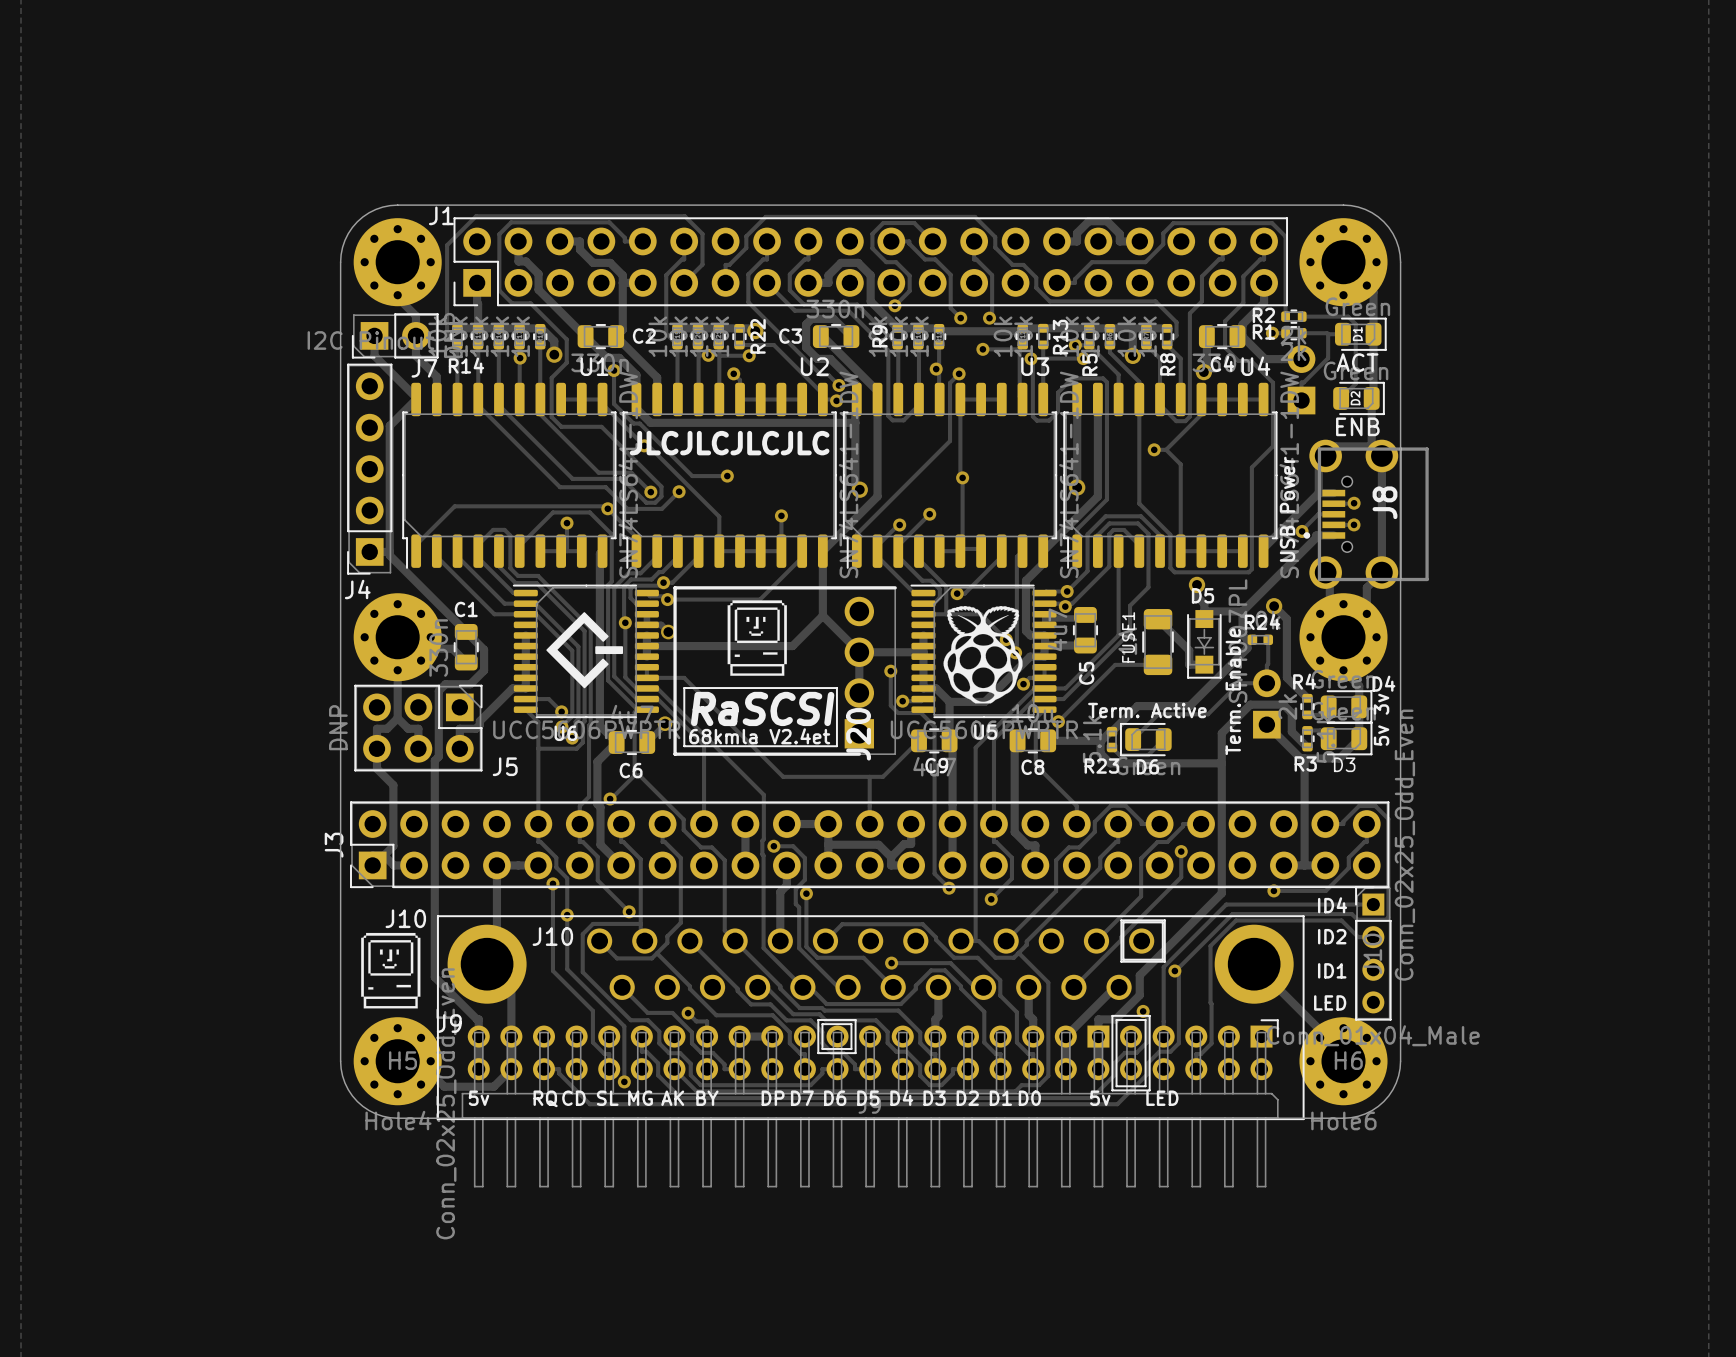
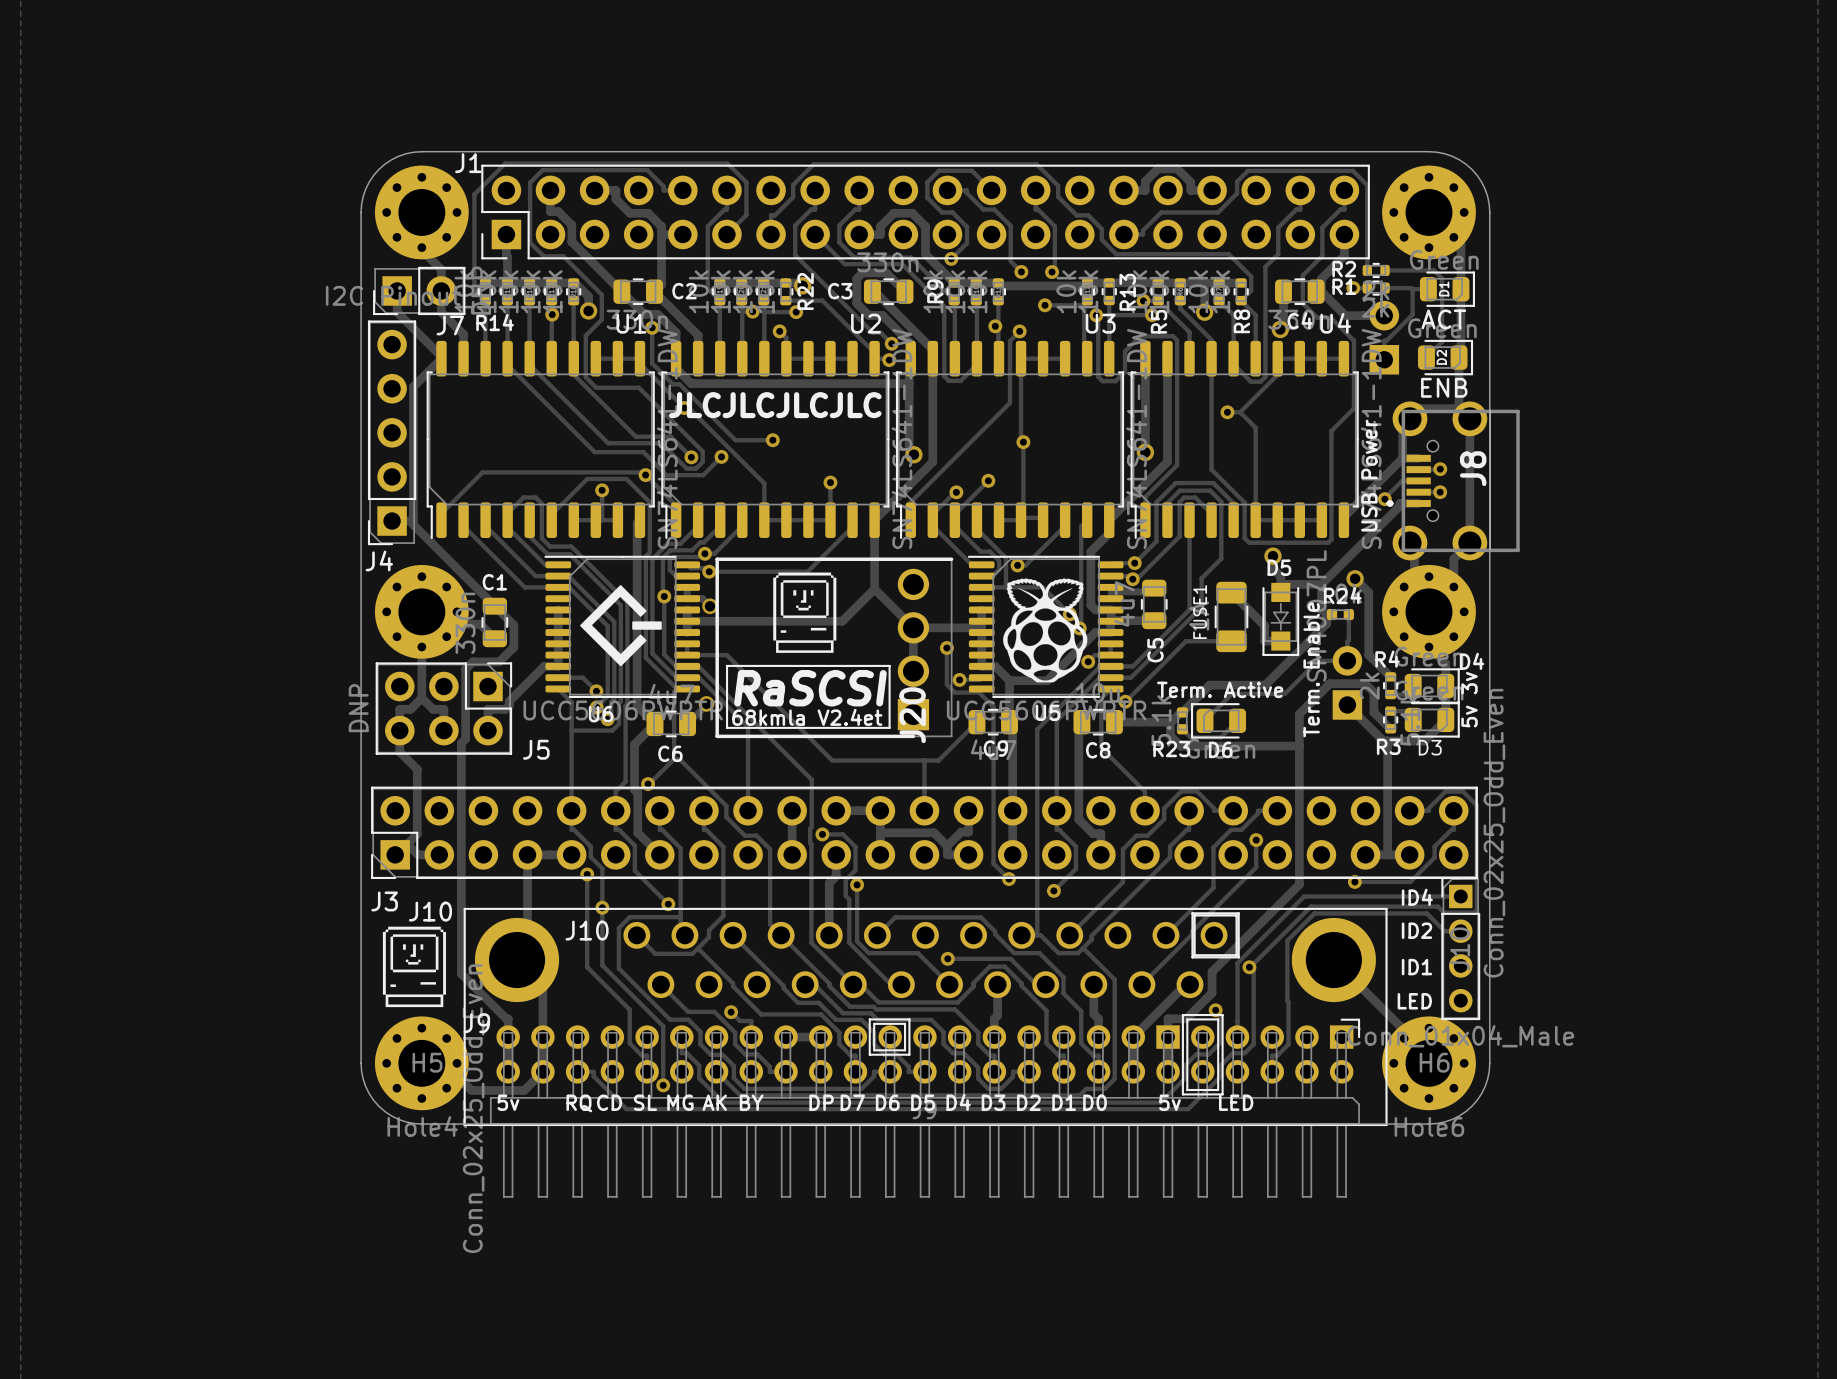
J3 name rotation: 0° (334, 845) -> 90° clockwise (384, 901)
J3 name position: J3 (334, 845) -> J3 (384, 901)

